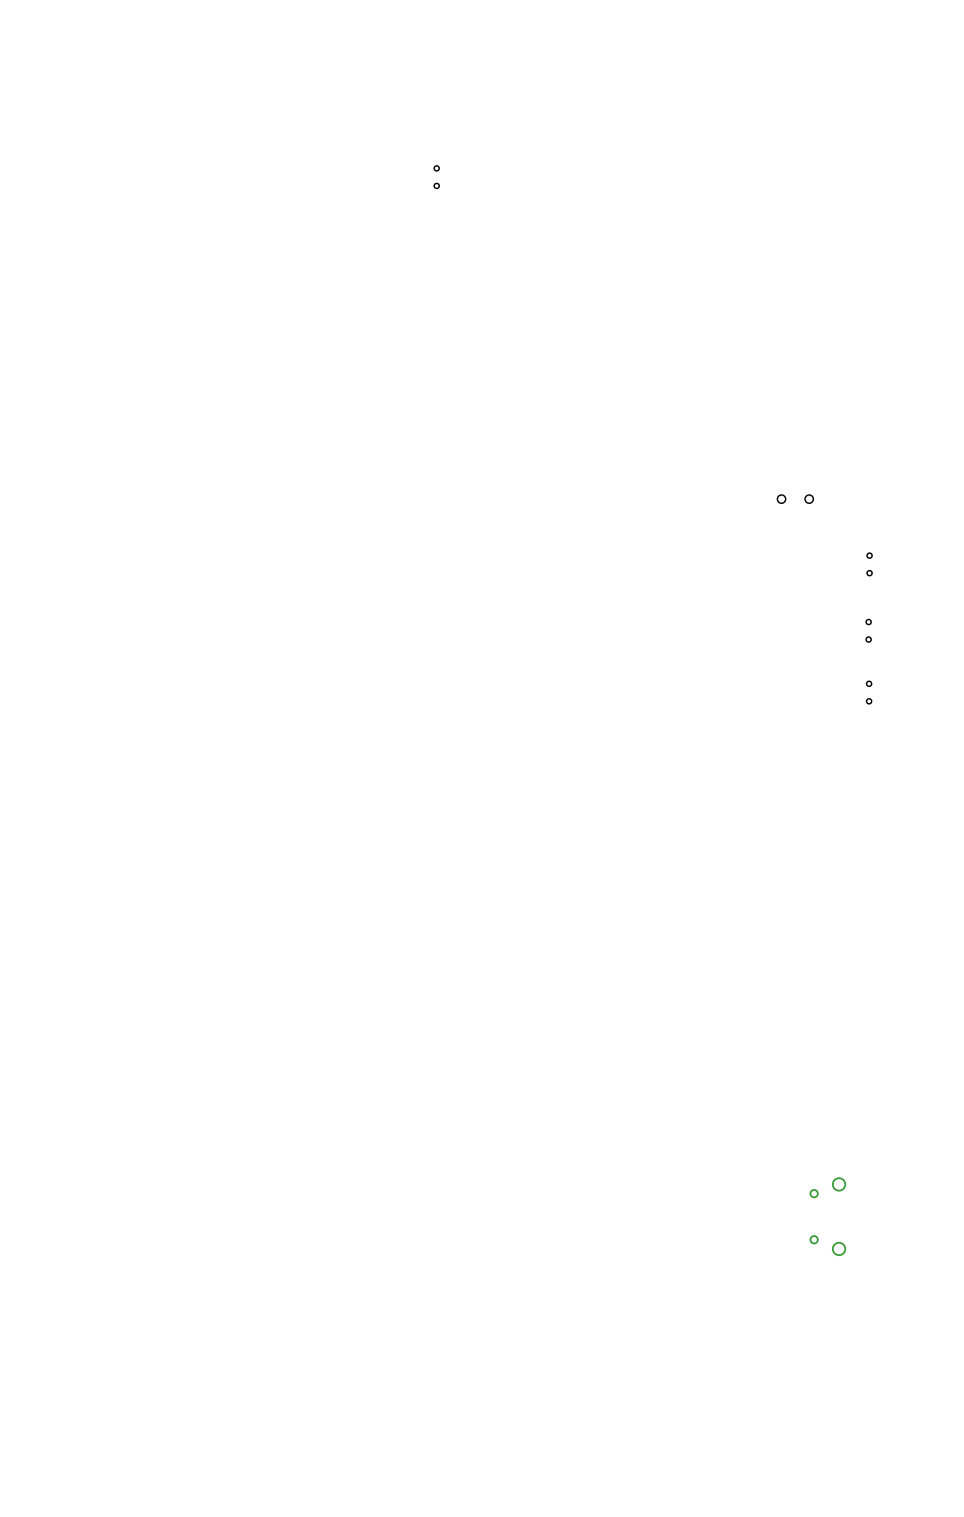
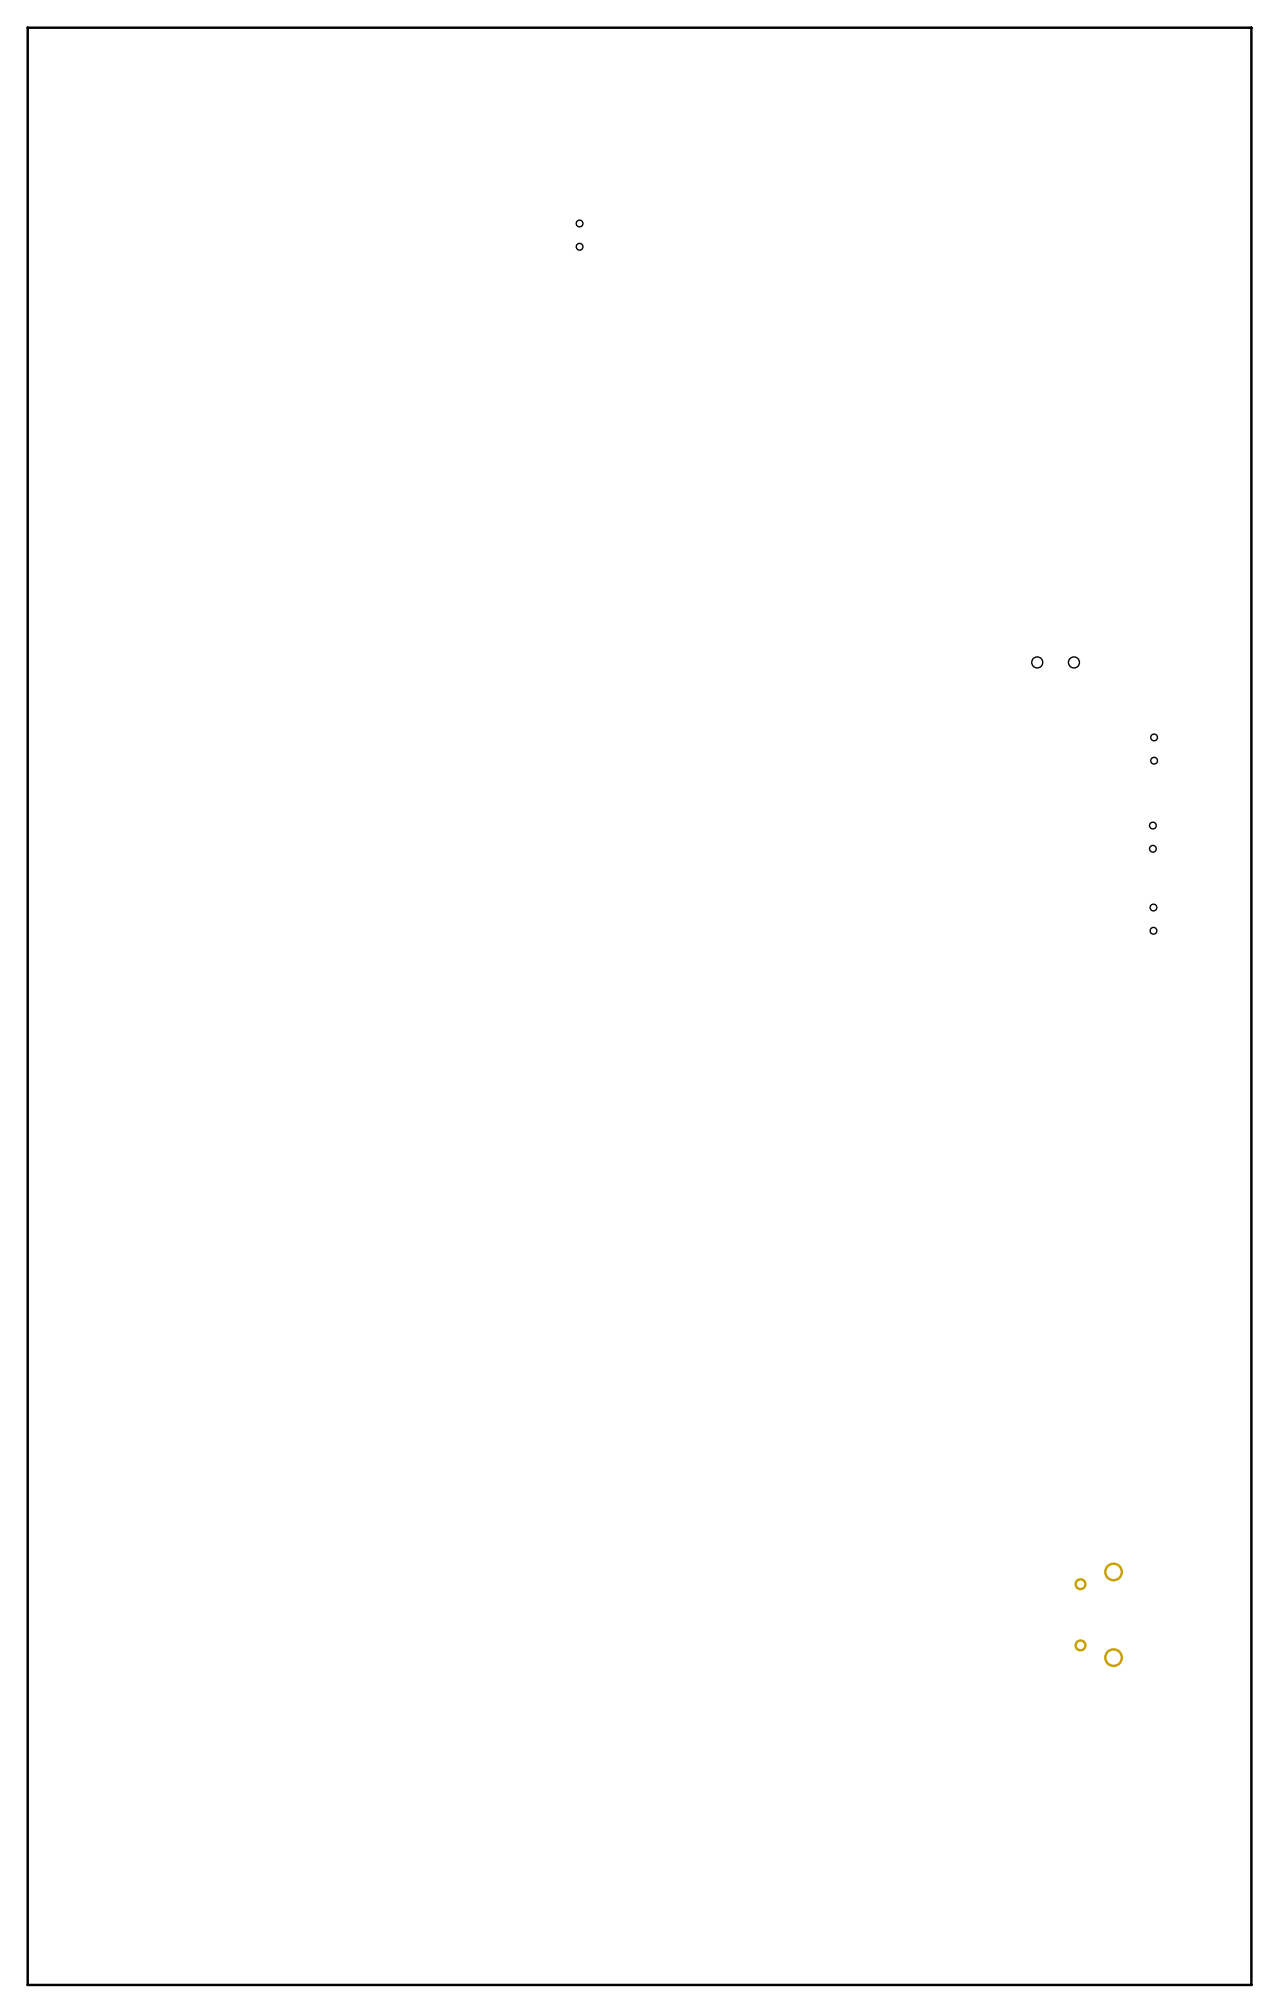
board edge: none -> (1251, 27) (1251, 1984) (27, 1984) (27, 27) (1251, 27)

